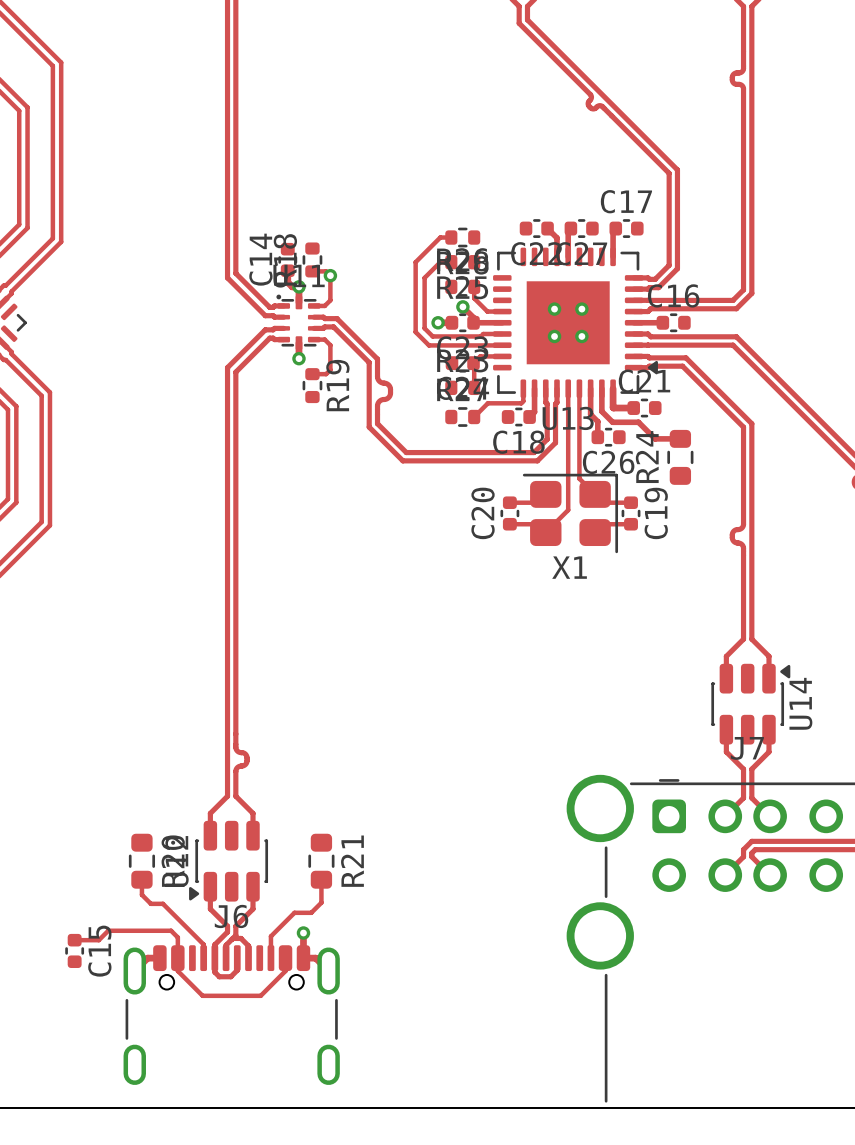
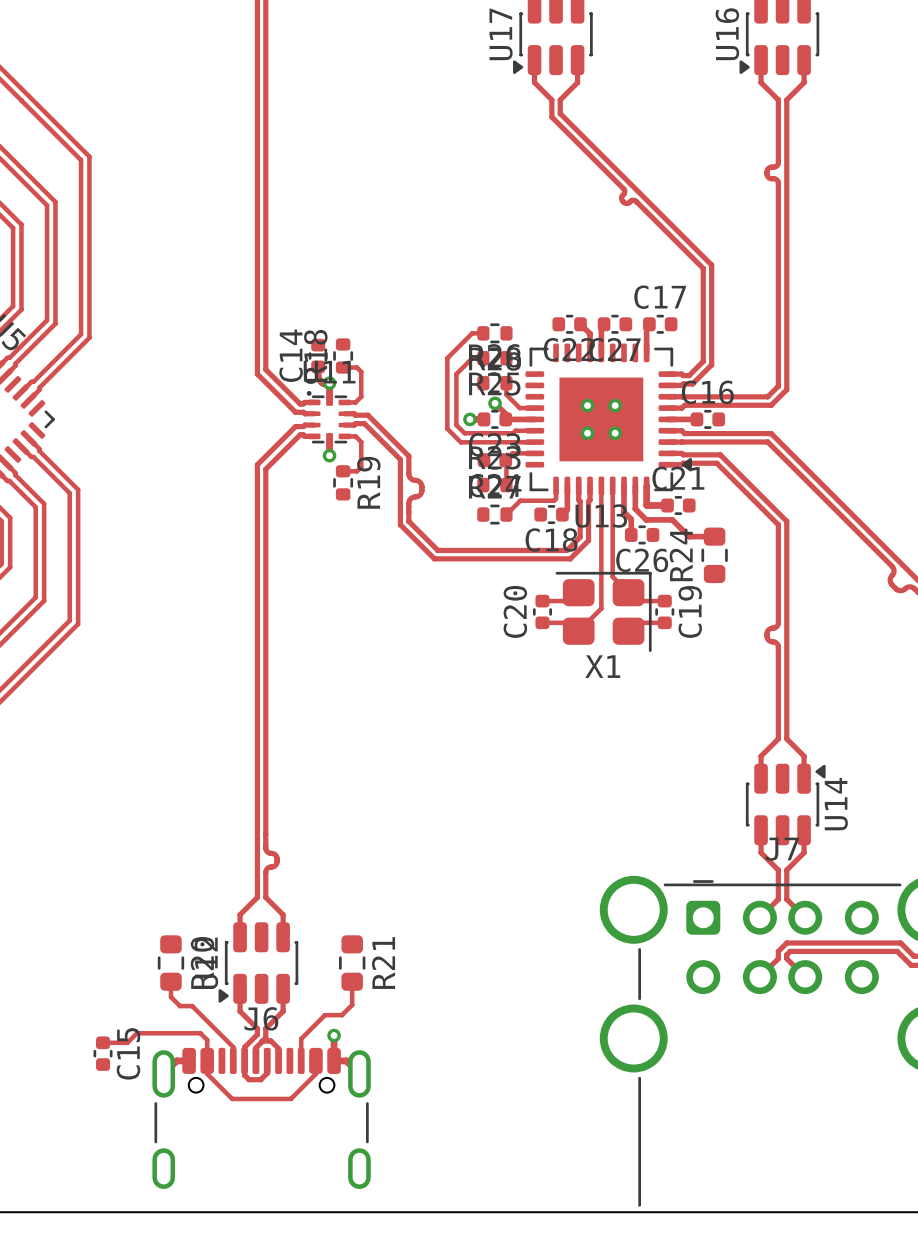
via: (330, 275) -> none

